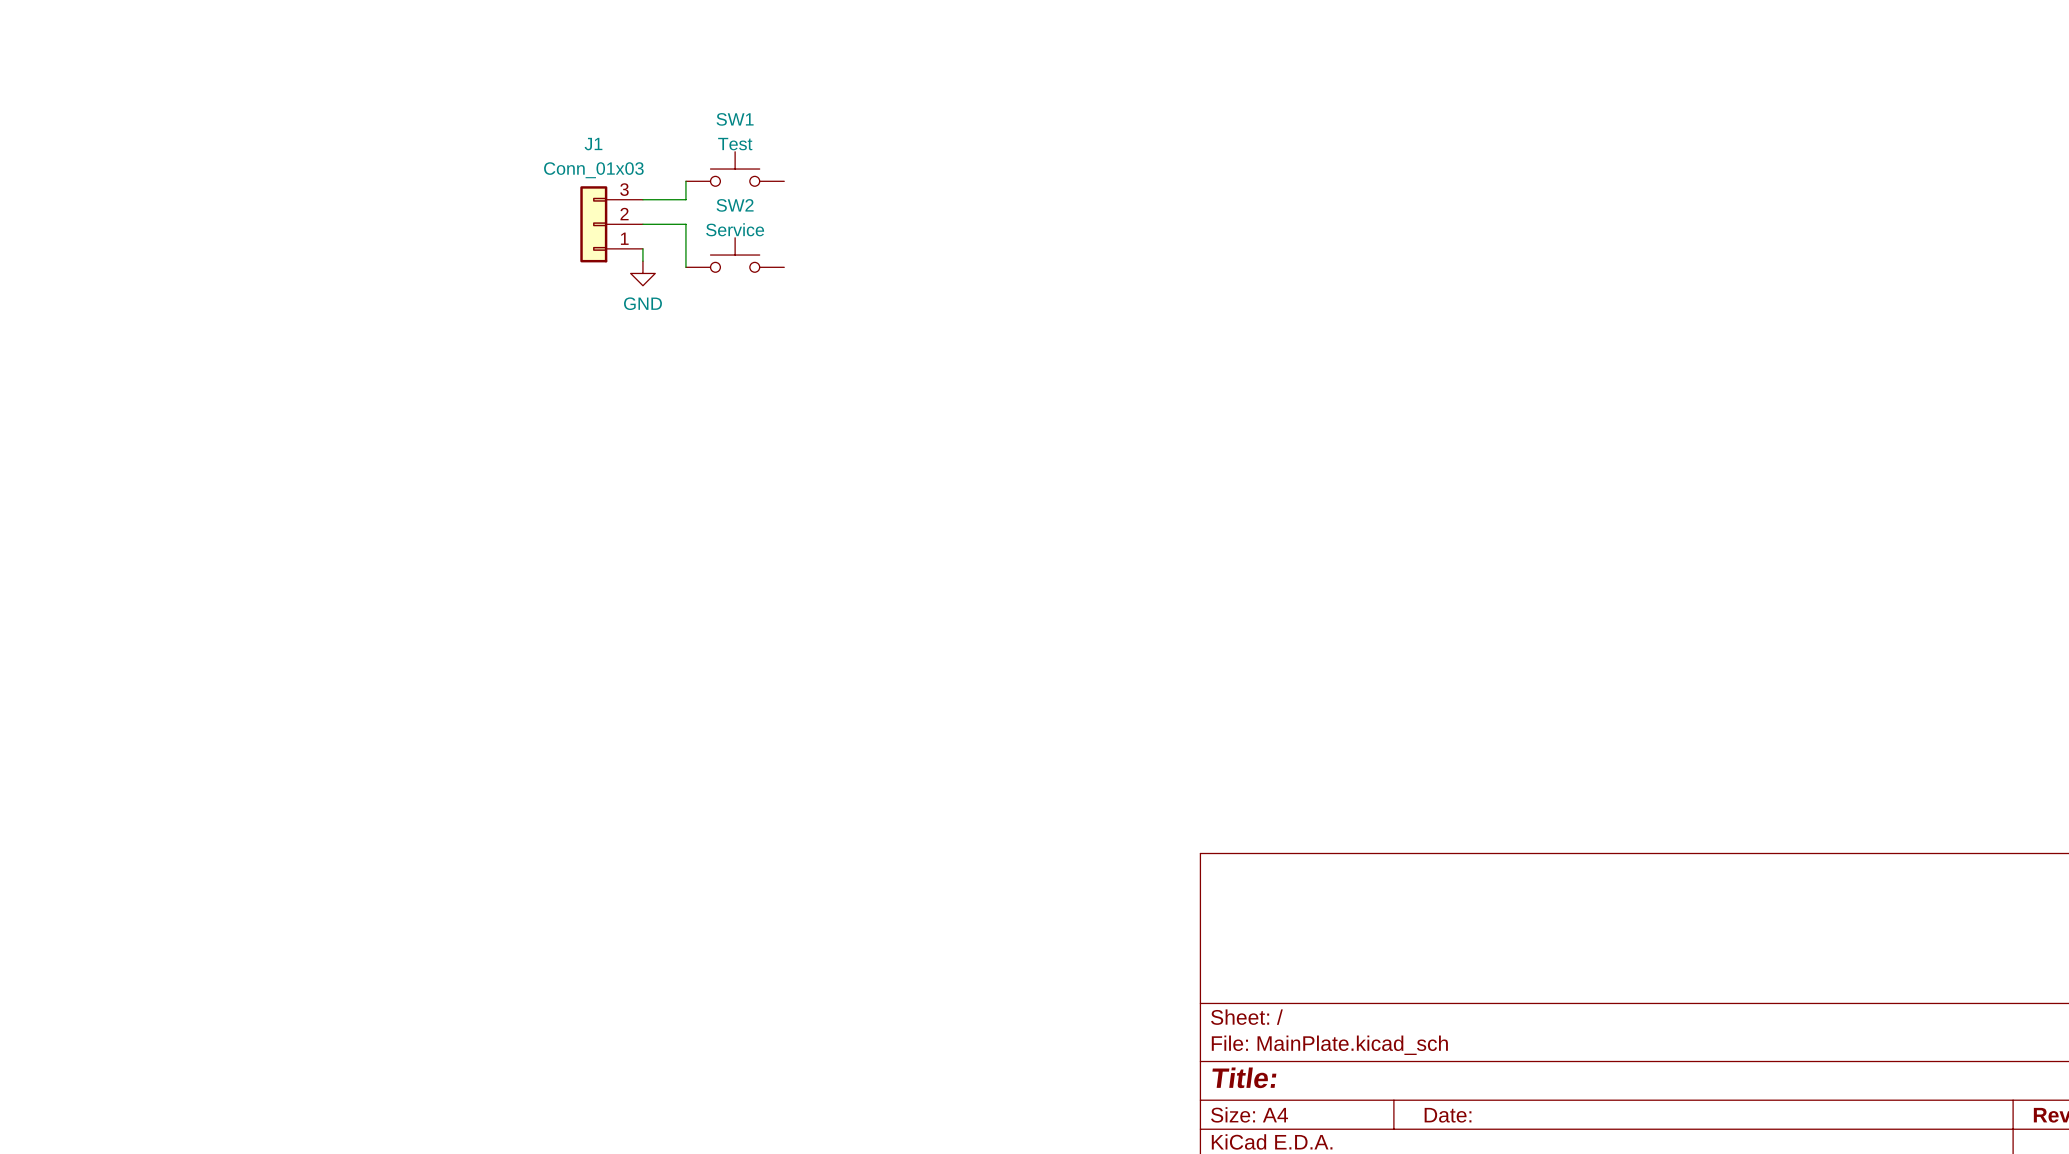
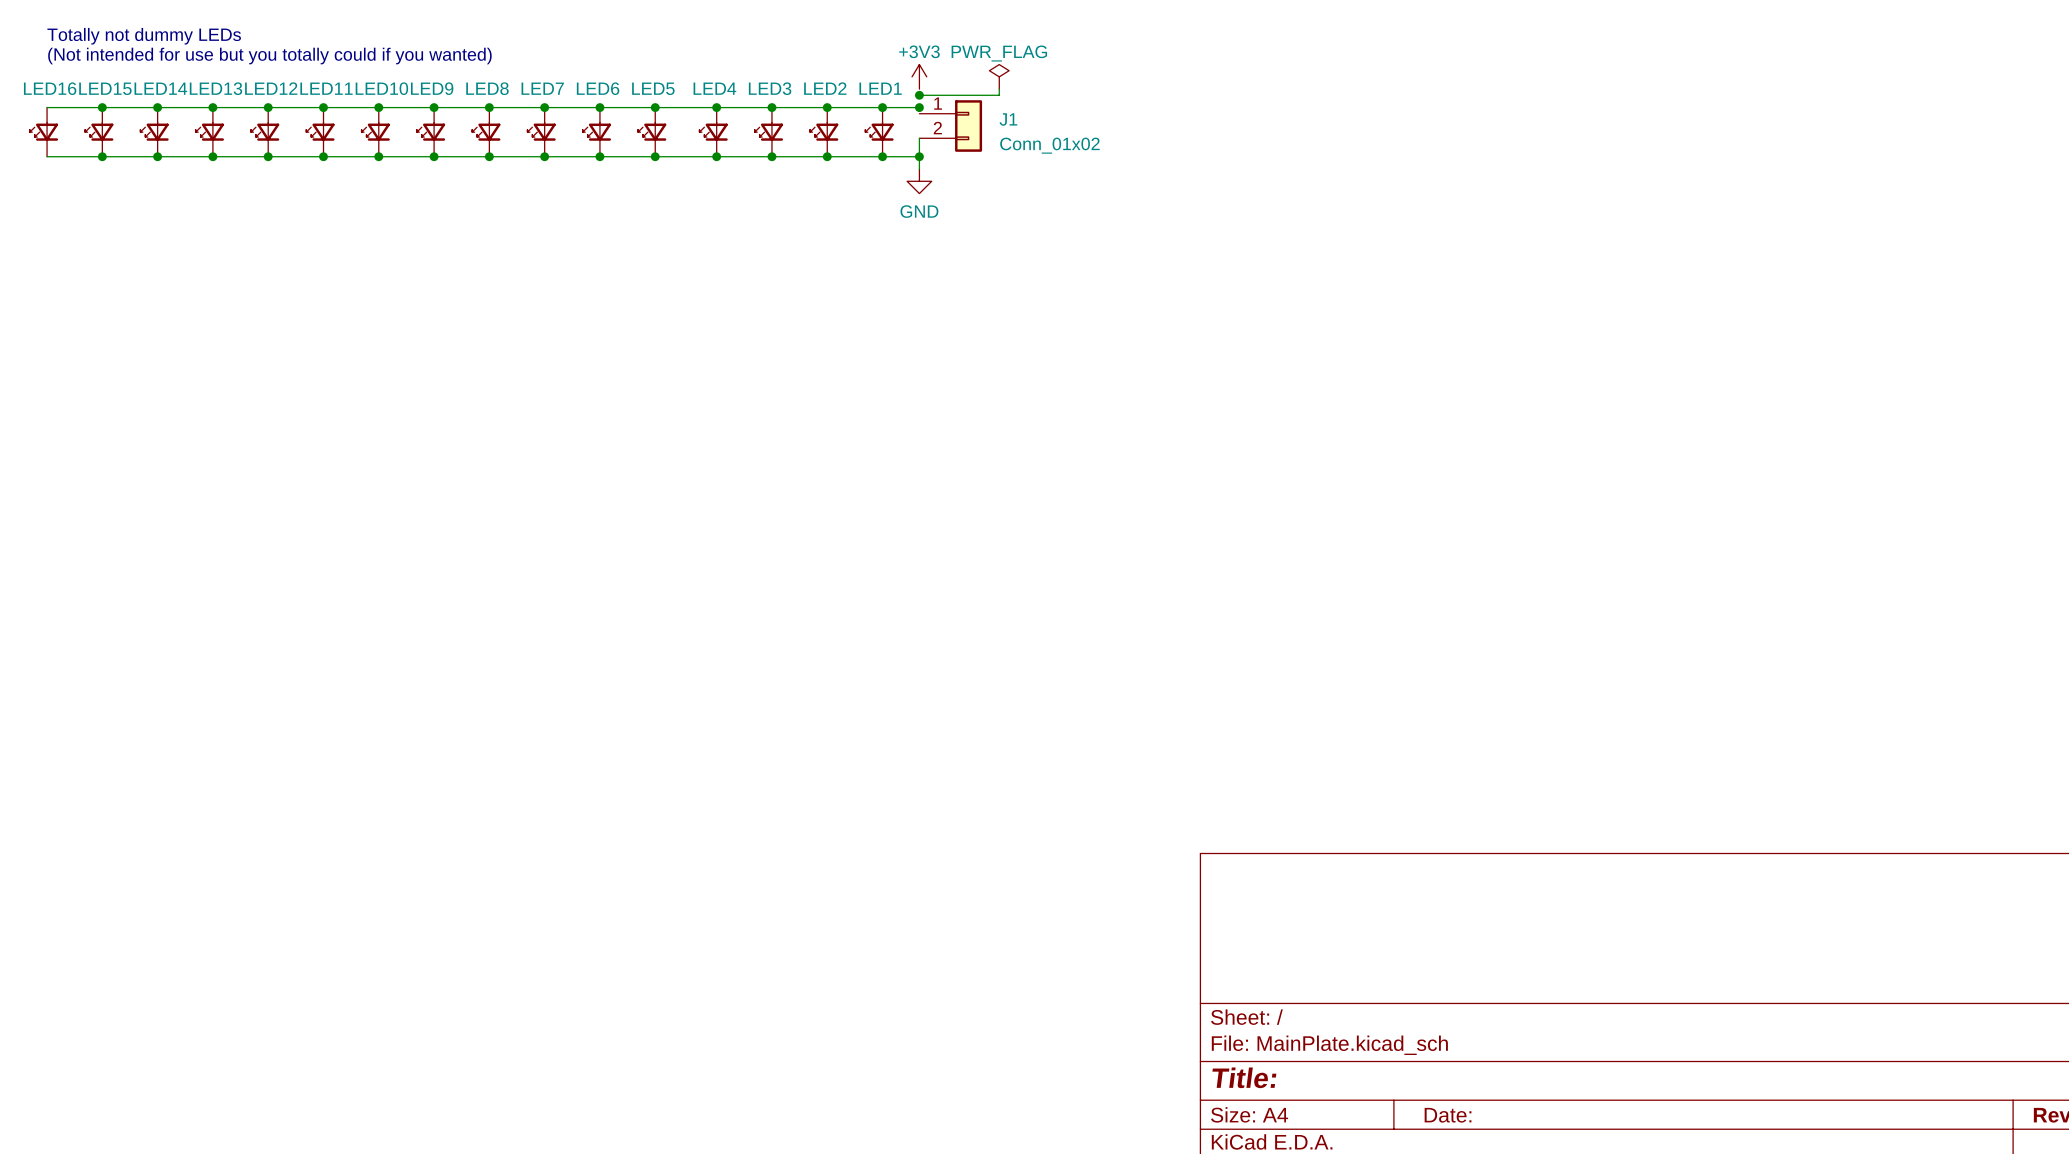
text: none -> Totally not dummy LEDs (144, 36)
text: none -> (Not intended for use but you totally could if you wanted) (269, 56)
power symbol: none -> +3V3 (919, 76)
power symbol: none -> PWR_FLAG (999, 76)
wire: none -> (999, 89) (999, 95) (919, 95)
junction: none -> (919, 95)
wire: none -> (47, 107) (919, 107)
junction: none -> (102, 107)
junction: none -> (157, 107)
junction: none -> (212, 107)
junction: none -> (268, 107)
junction: none -> (323, 107)
junction: none -> (378, 107)
junction: none -> (434, 107)
junction: none -> (489, 107)
junction: none -> (544, 107)
junction: none -> (599, 107)
junction: none -> (655, 107)
junction: none -> (716, 107)
junction: none -> (771, 107)
junction: none -> (827, 107)
junction: none -> (882, 107)
junction: none -> (919, 107)
LED16: none -> (43, 132)
LED15: none -> (99, 132)
LED14: none -> (154, 132)
LED13: none -> (209, 132)
LED12: none -> (265, 132)
LED11: none -> (320, 132)
LED10: none -> (375, 132)
LED9: none -> (431, 132)
LED8: none -> (486, 132)
LED7: none -> (541, 132)
LED6: none -> (596, 132)
LED5: none -> (652, 132)
LED4: none -> (713, 132)
LED3: none -> (768, 132)
LED2: none -> (824, 132)
LED1: none -> (879, 132)
wire: none -> (919, 138) (919, 169)
J1 name position: J1 (593, 144) -> J1 (1008, 119)
wire: none -> (47, 156) (919, 156)
junction: none -> (102, 156)
junction: none -> (157, 156)
junction: none -> (212, 156)
junction: none -> (268, 156)
junction: none -> (323, 156)
junction: none -> (378, 156)
junction: none -> (434, 156)
junction: none -> (489, 156)
junction: none -> (544, 156)
junction: none -> (599, 156)
junction: none -> (655, 156)
junction: none -> (716, 156)
junction: none -> (771, 156)
junction: none -> (827, 156)
junction: none -> (882, 156)
junction: none -> (919, 156)
SW1: Test (735, 169) -> none
J1 value: Conn_01x03 (593, 170) -> Conn_01x02 (1049, 145)
wire: (685, 181) (685, 199) (642, 199) -> none
power symbol: none -> GND (919, 181)
J1 symbol: [580, 186, 643, 263] -> [919, 100, 983, 152]
wire: (642, 224) (685, 224) (685, 267) -> none
wire: (642, 248) (642, 261) -> none
SW2: Service (735, 255) -> none
power symbol: GND (642, 273) -> none

